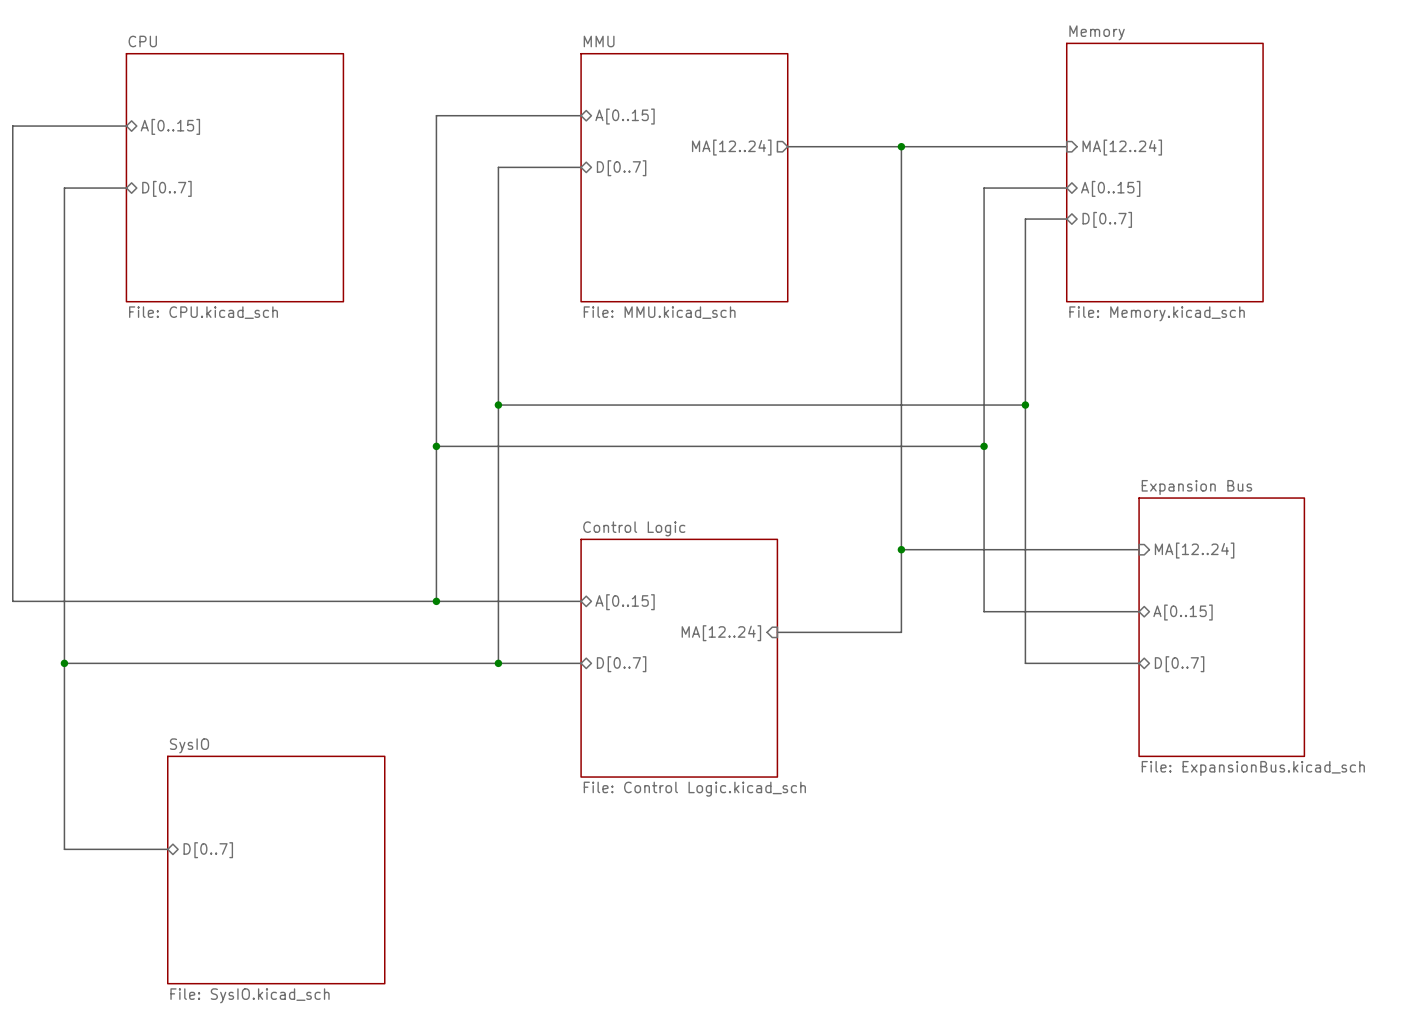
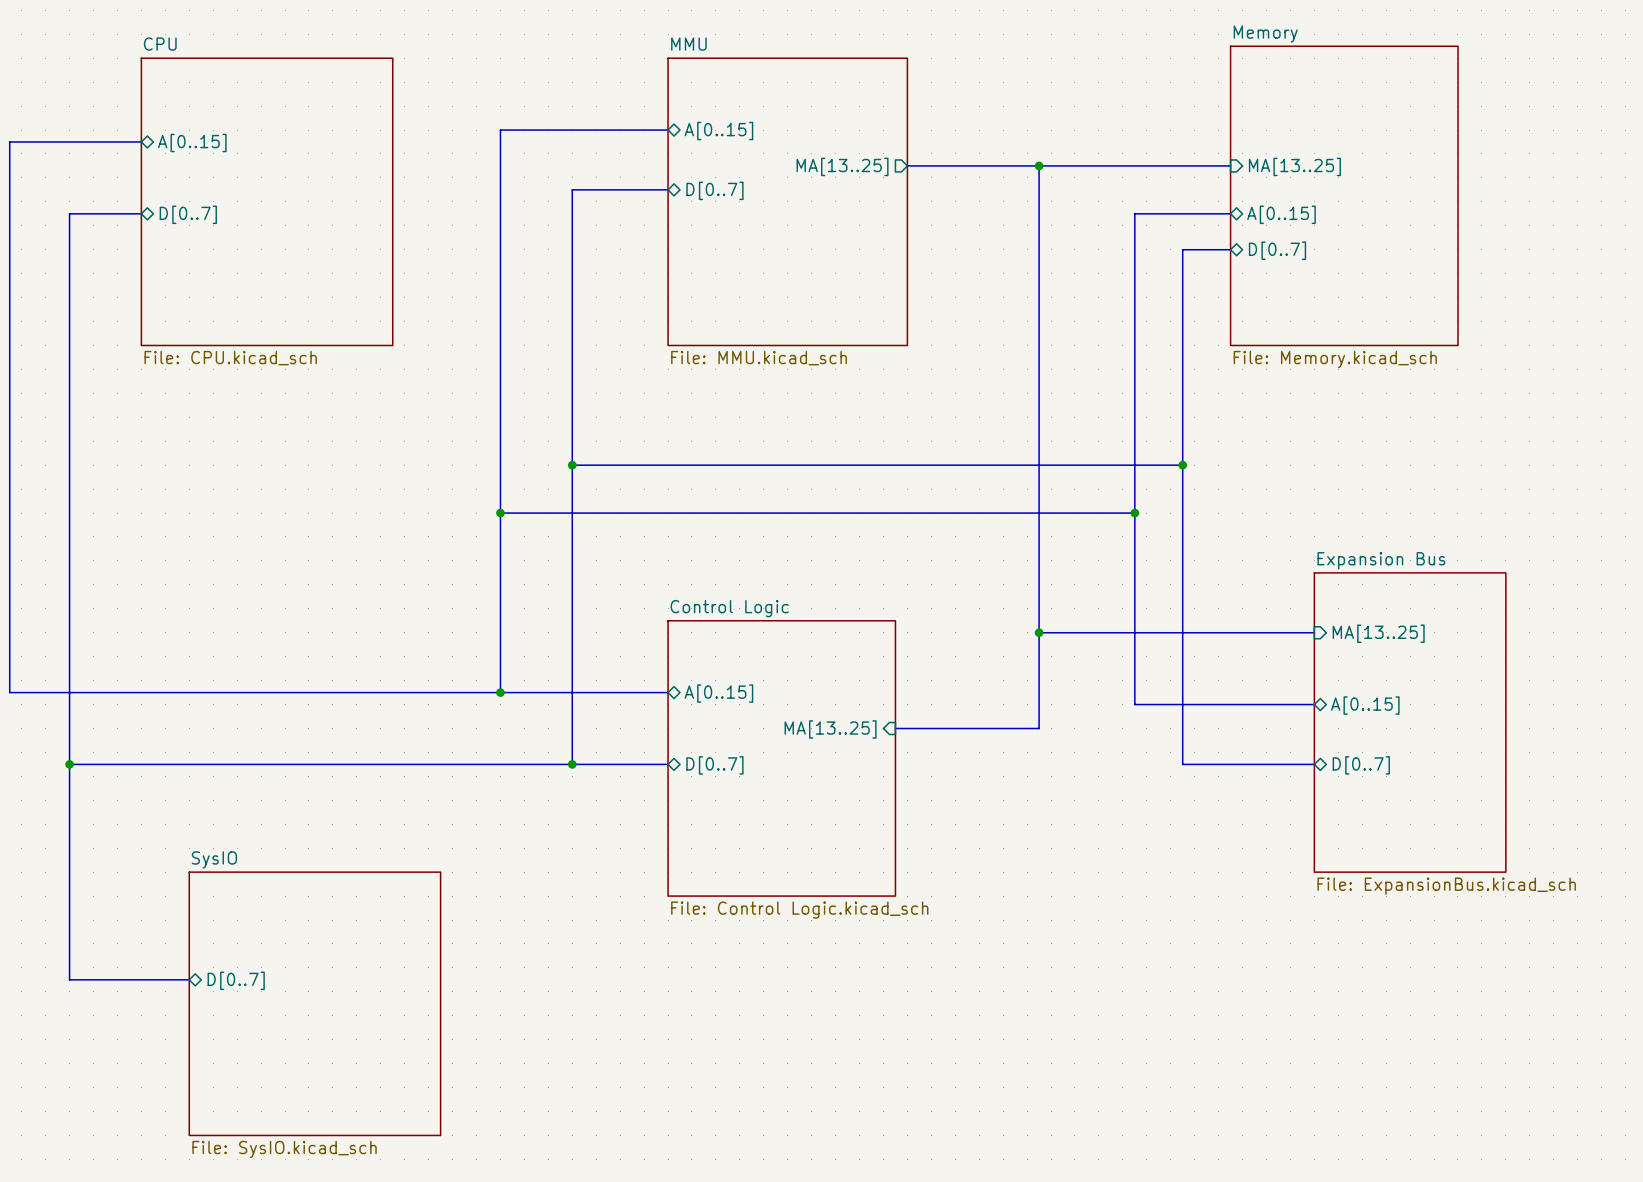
sheet pin: MA[12..24] (731, 147) -> MA[13..25] (842, 166)
sheet pin: MA[12..24] (1122, 147) -> MA[13..25] (1294, 166)
sheet pin: MA[12..24] (1194, 550) -> MA[13..25] (1378, 633)
sheet pin: MA[12..24] (721, 633) -> MA[13..25] (830, 729)

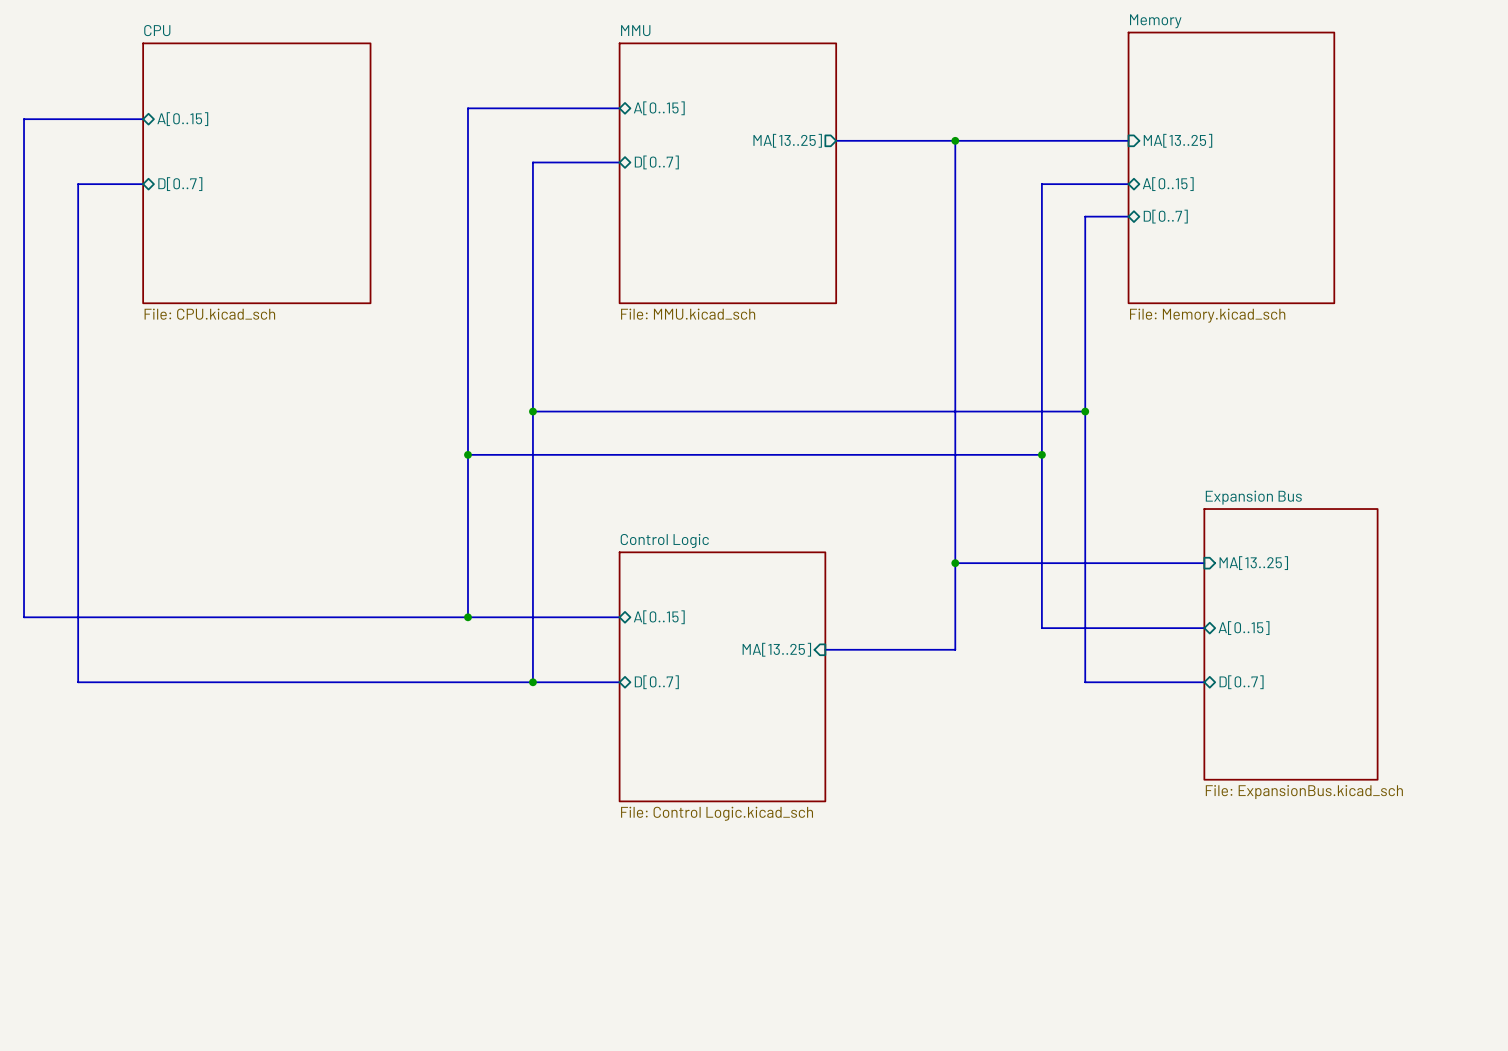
bus: (69, 764) (69, 979) (189, 979) -> none
junction: (69, 764) -> none
sheet pin: D[0..7] (236, 980) -> none
sheet SysIO: File: SysIO.kicad_sch (314, 1003) -> none

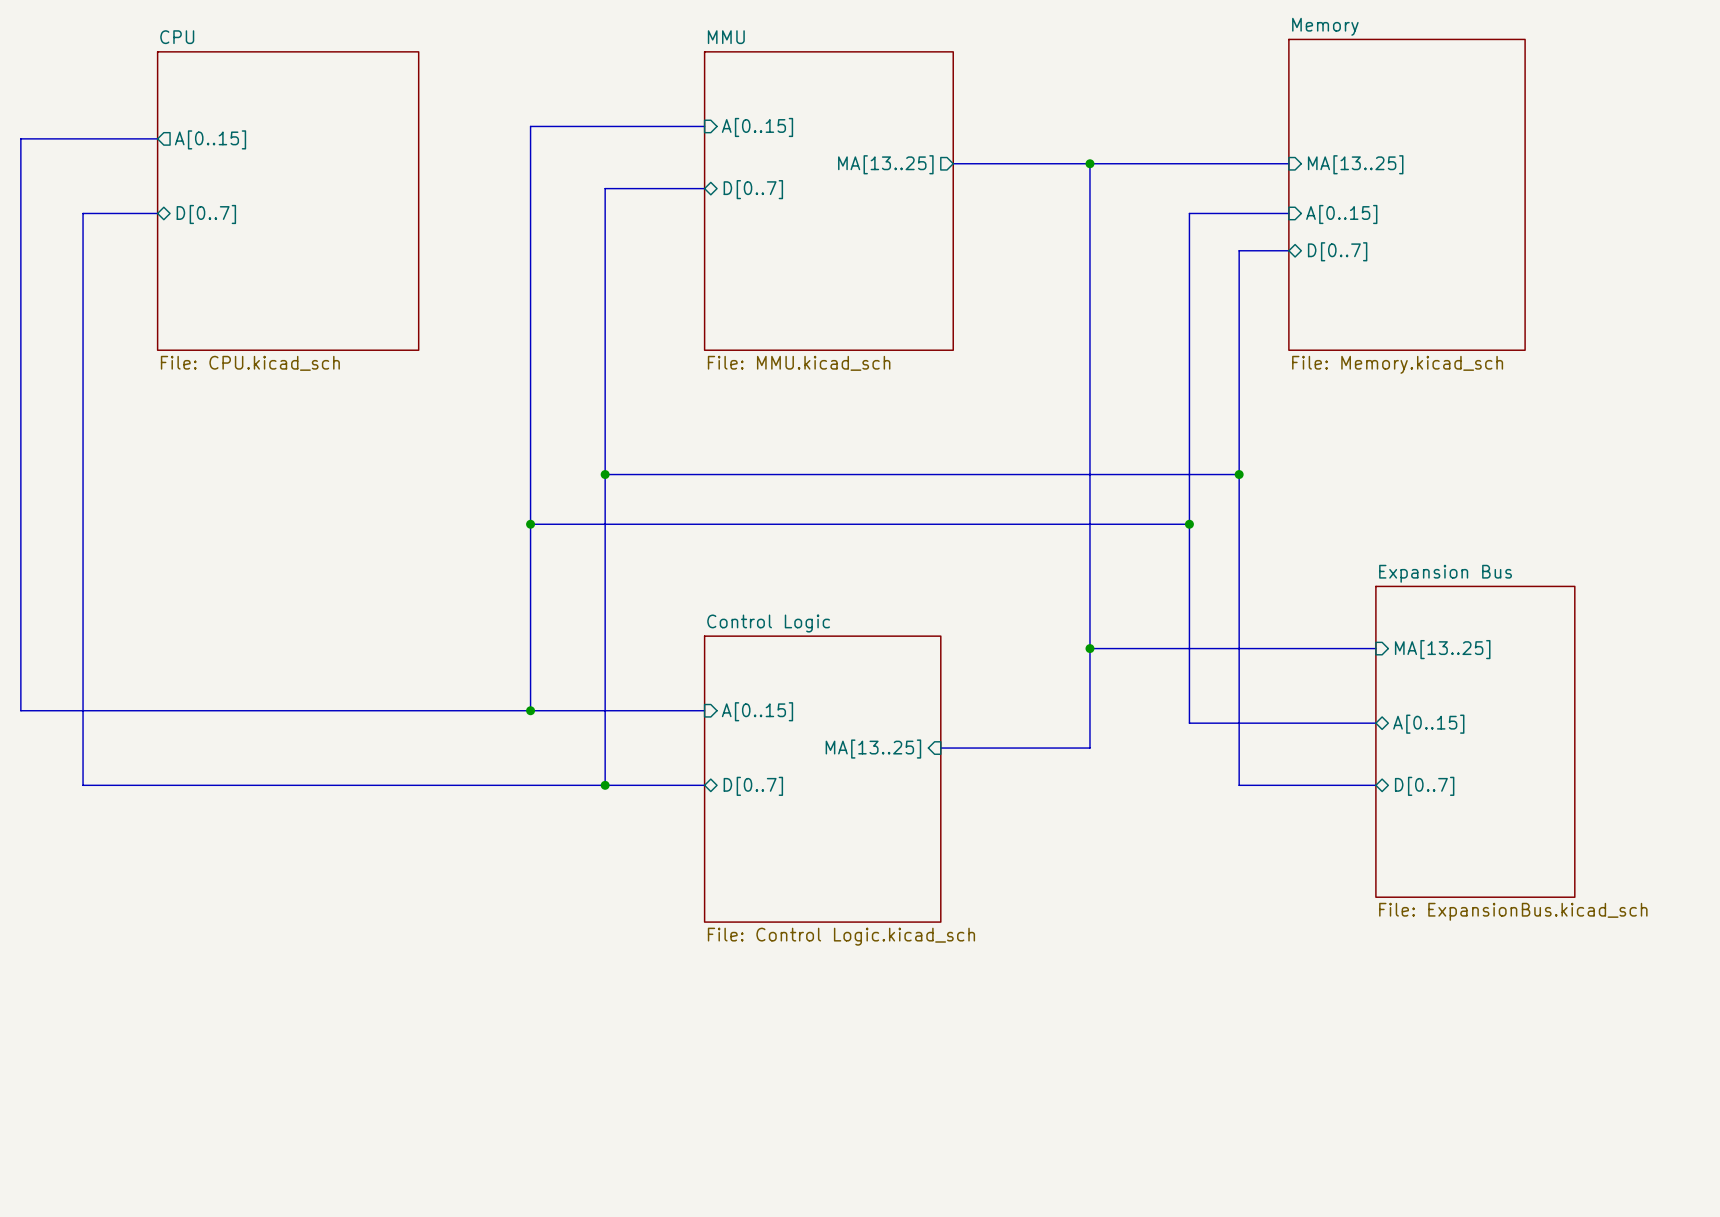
sheet pin shape: bidirectional (659, 108) -> input (757, 127)
sheet pin shape: bidirectional (182, 119) -> output (210, 139)
sheet pin shape: bidirectional (1168, 184) -> input (1341, 214)
sheet pin shape: bidirectional (659, 617) -> input (757, 711)

